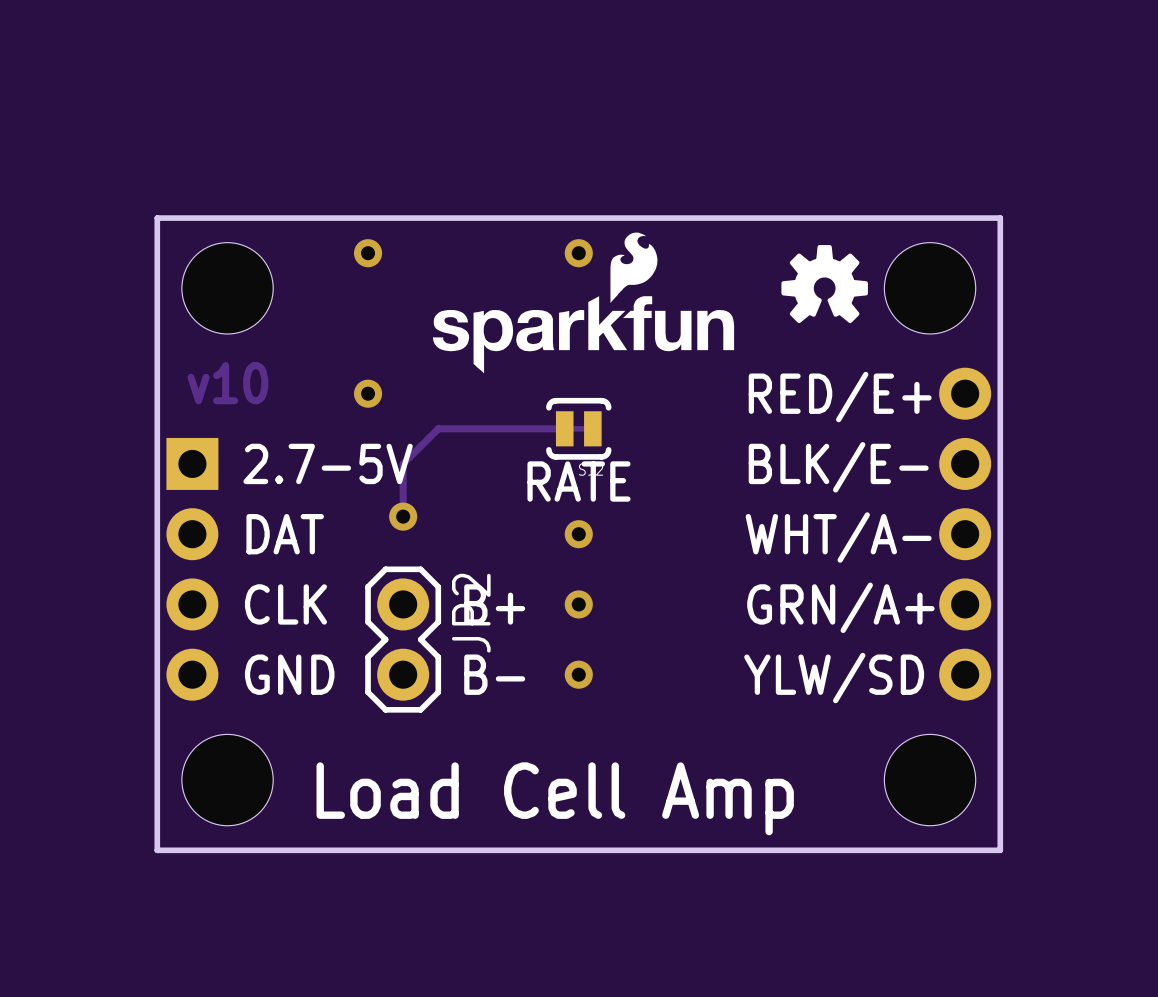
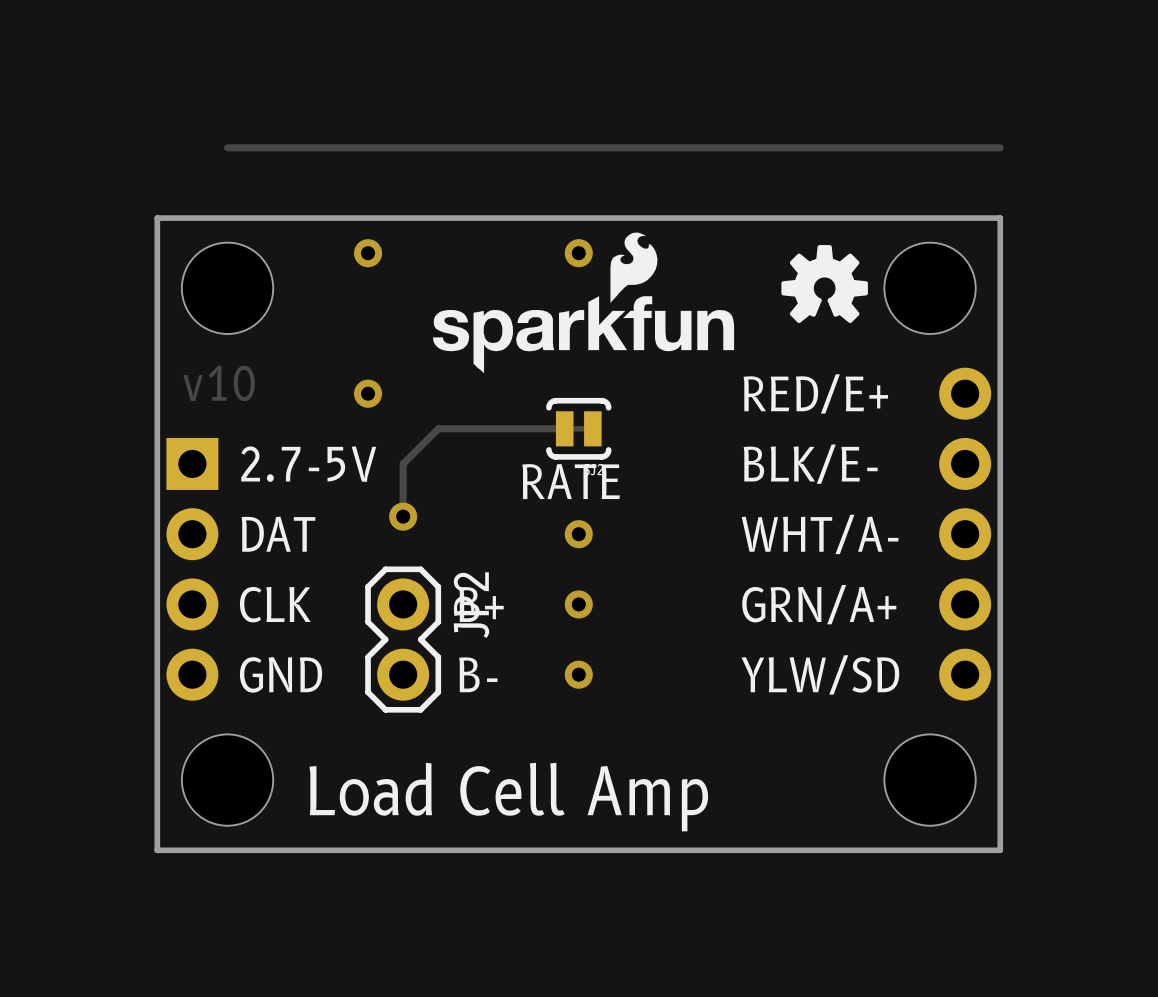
track: none -> (1000, 147) (227, 147)

